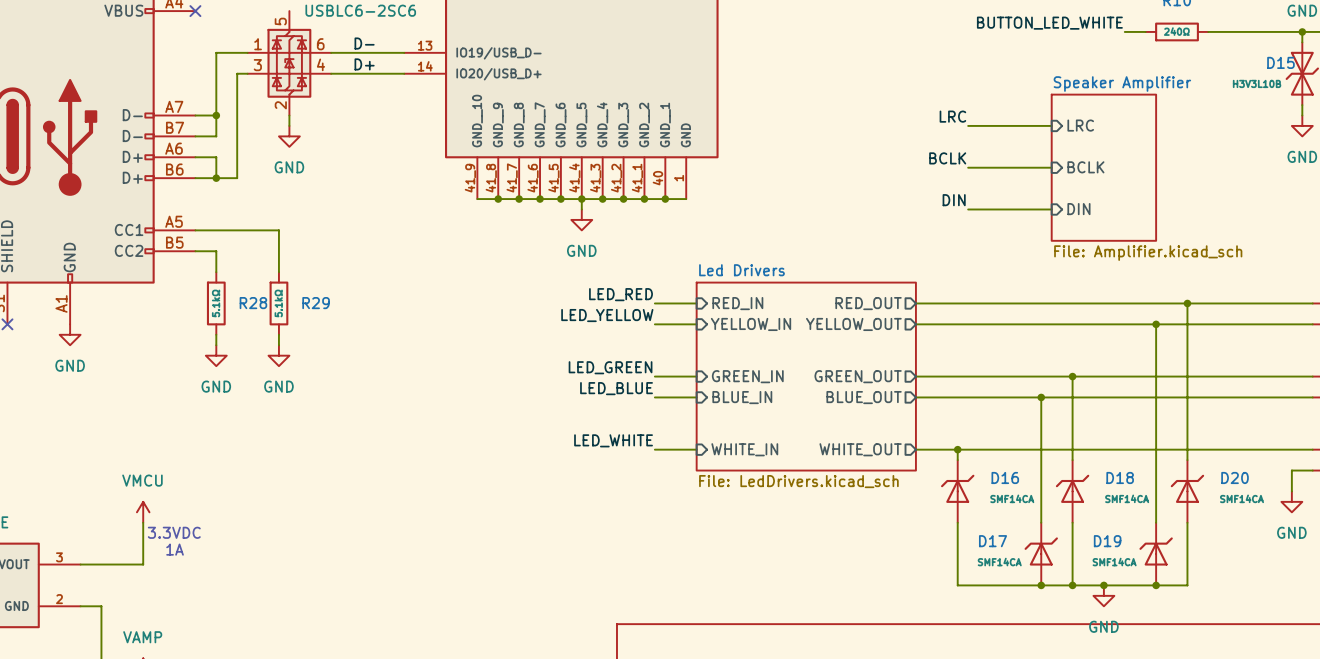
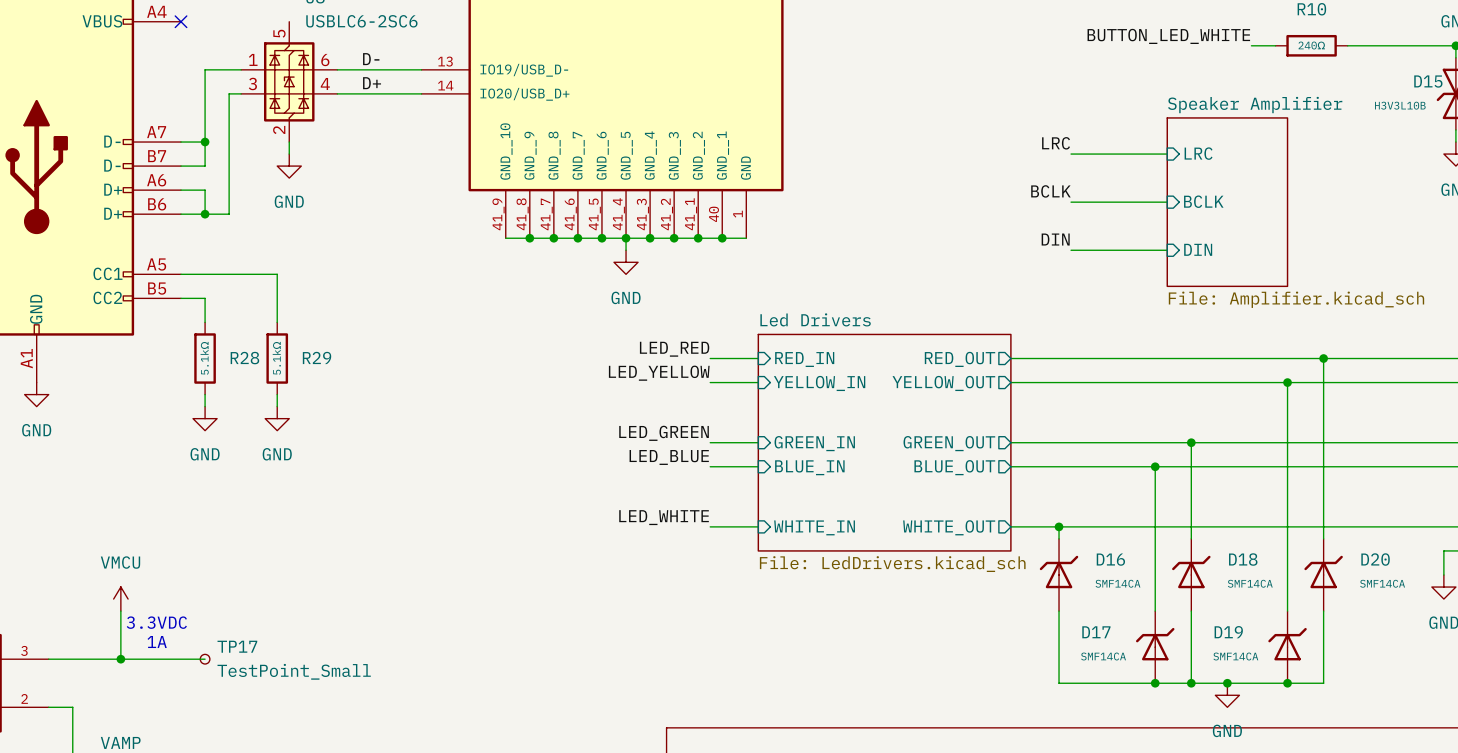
wire: none -> (120, 659) (205, 659)
junction: none -> (120, 659)
TP17: none -> TestPoint_Small (205, 659)

